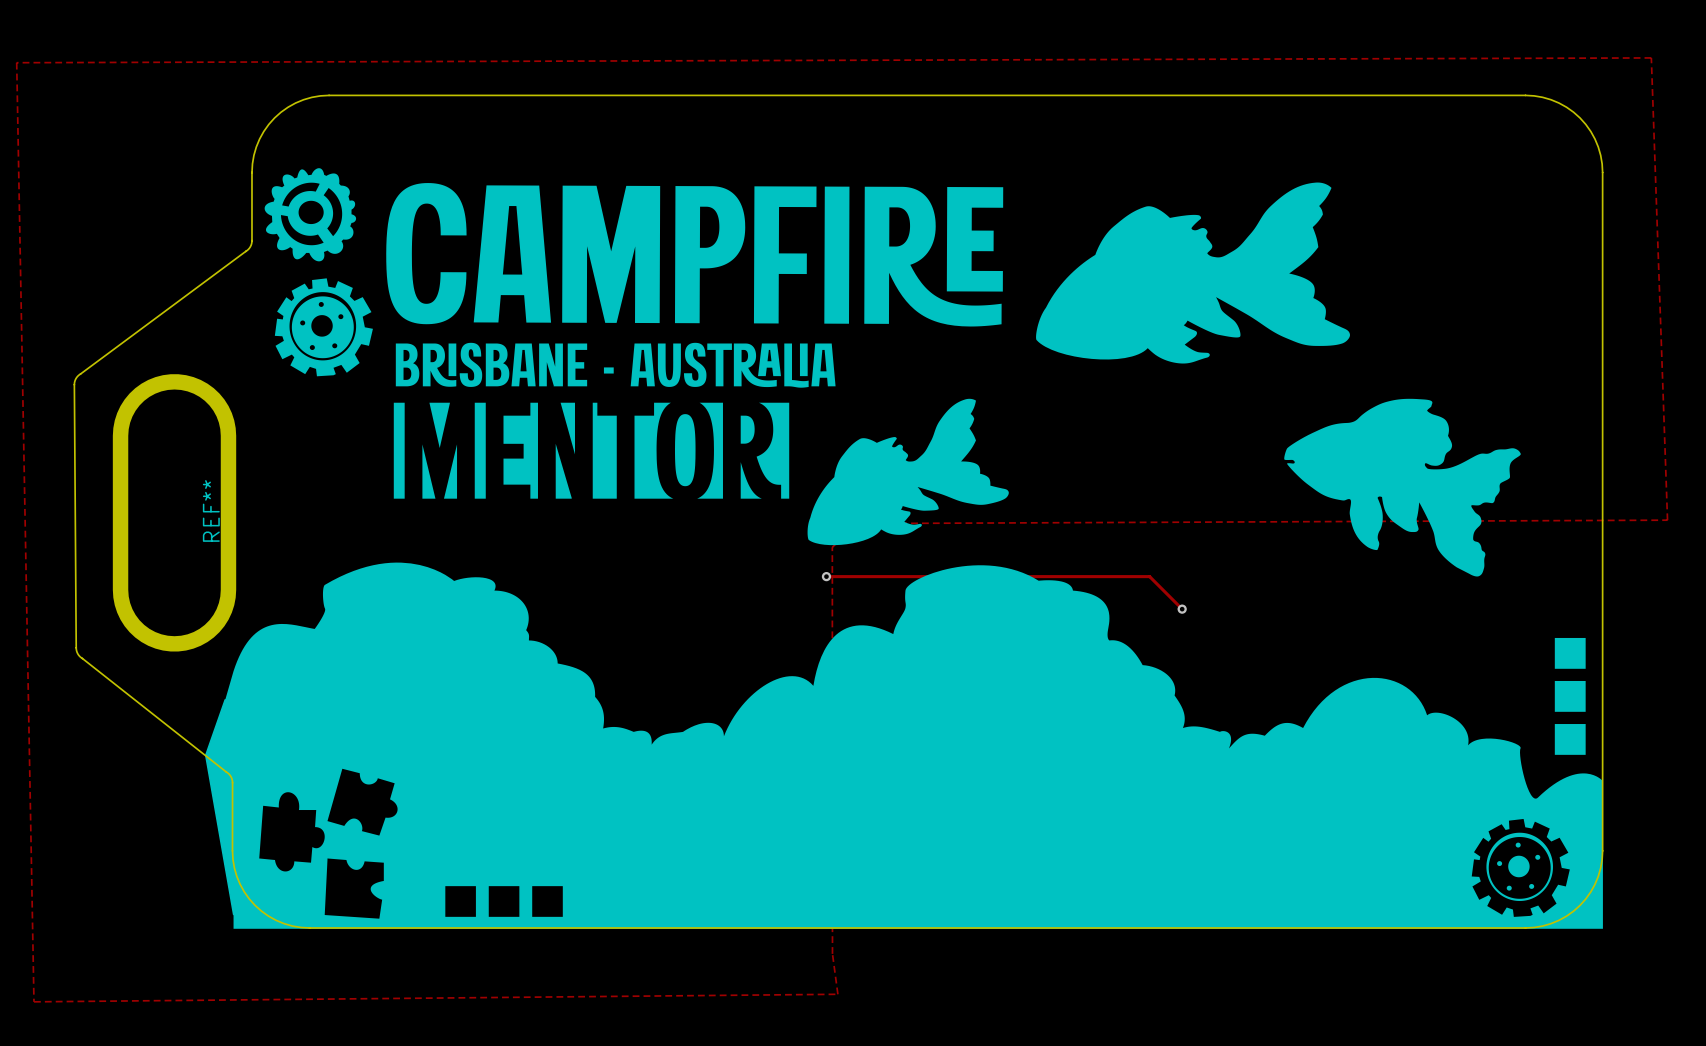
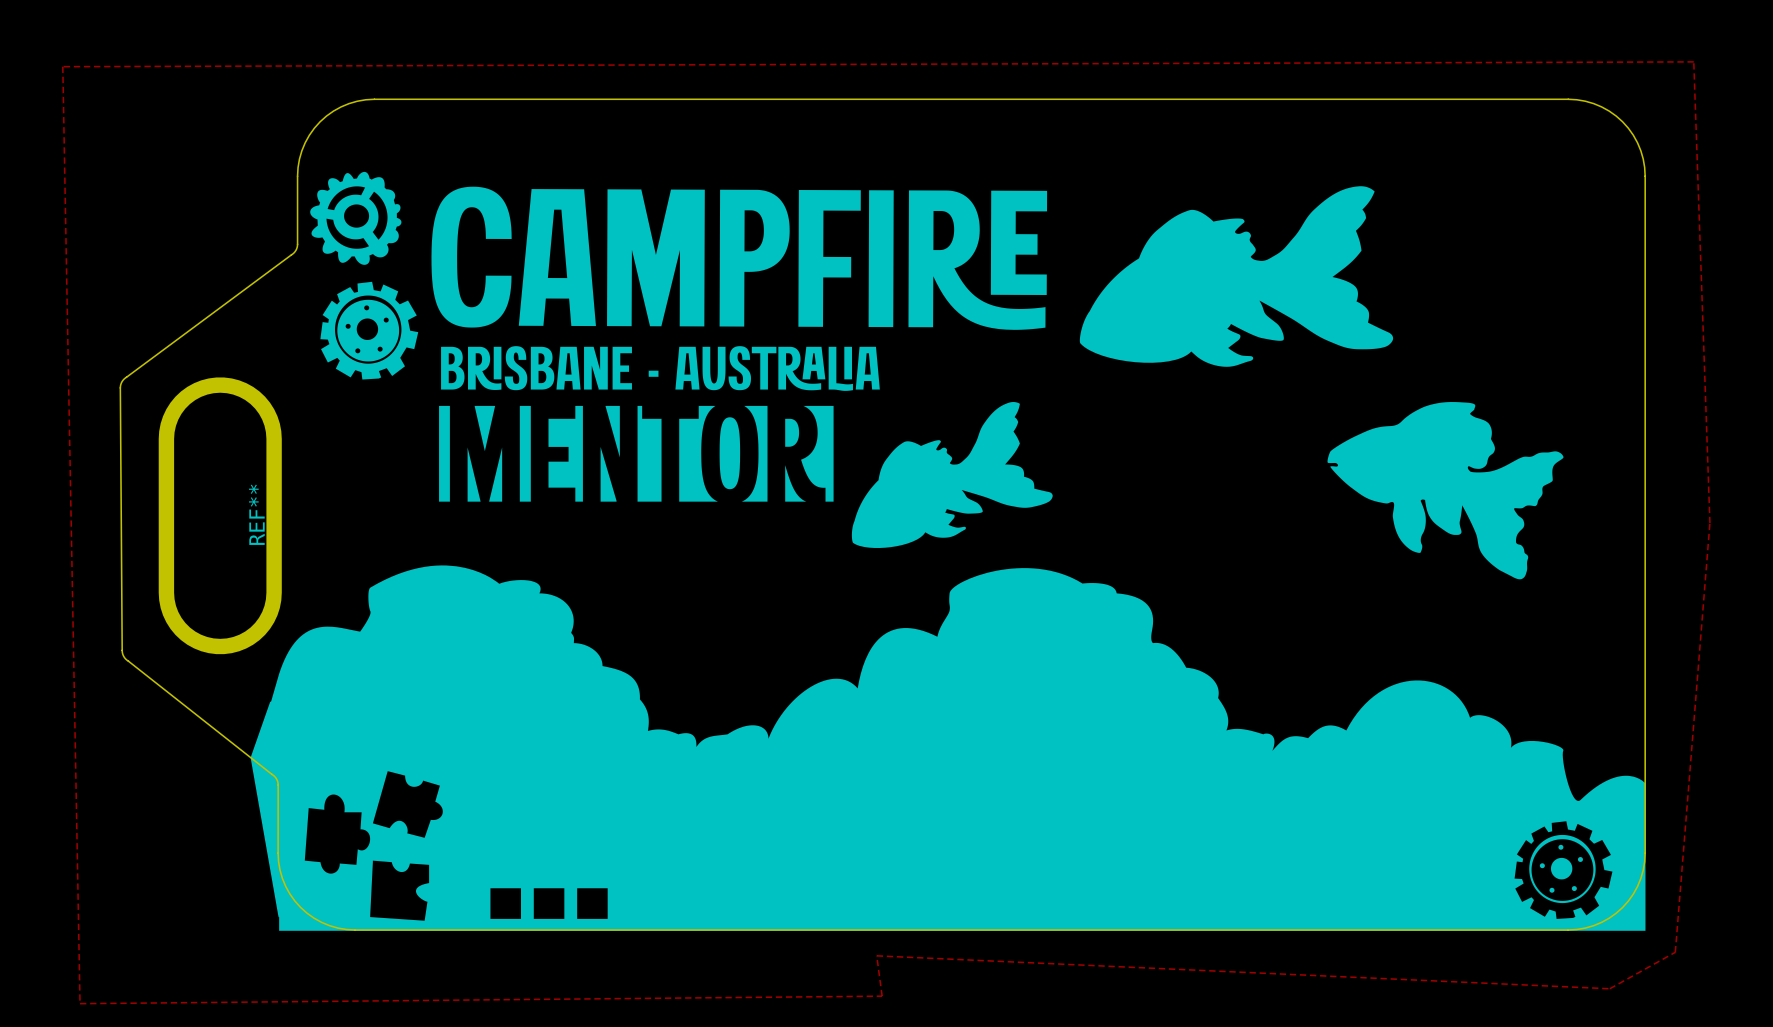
zone outline: (1667, 520) (856, 523) (832, 547) (832, 953) -> (1709, 523) (1675, 952) (1609, 988) (876, 955)
track: (826, 576) (1149, 576) (1182, 609) -> none
via: (826, 576) -> none
via: (1182, 609) -> none
drawing: [1554, 637, 1586, 755] -> none

